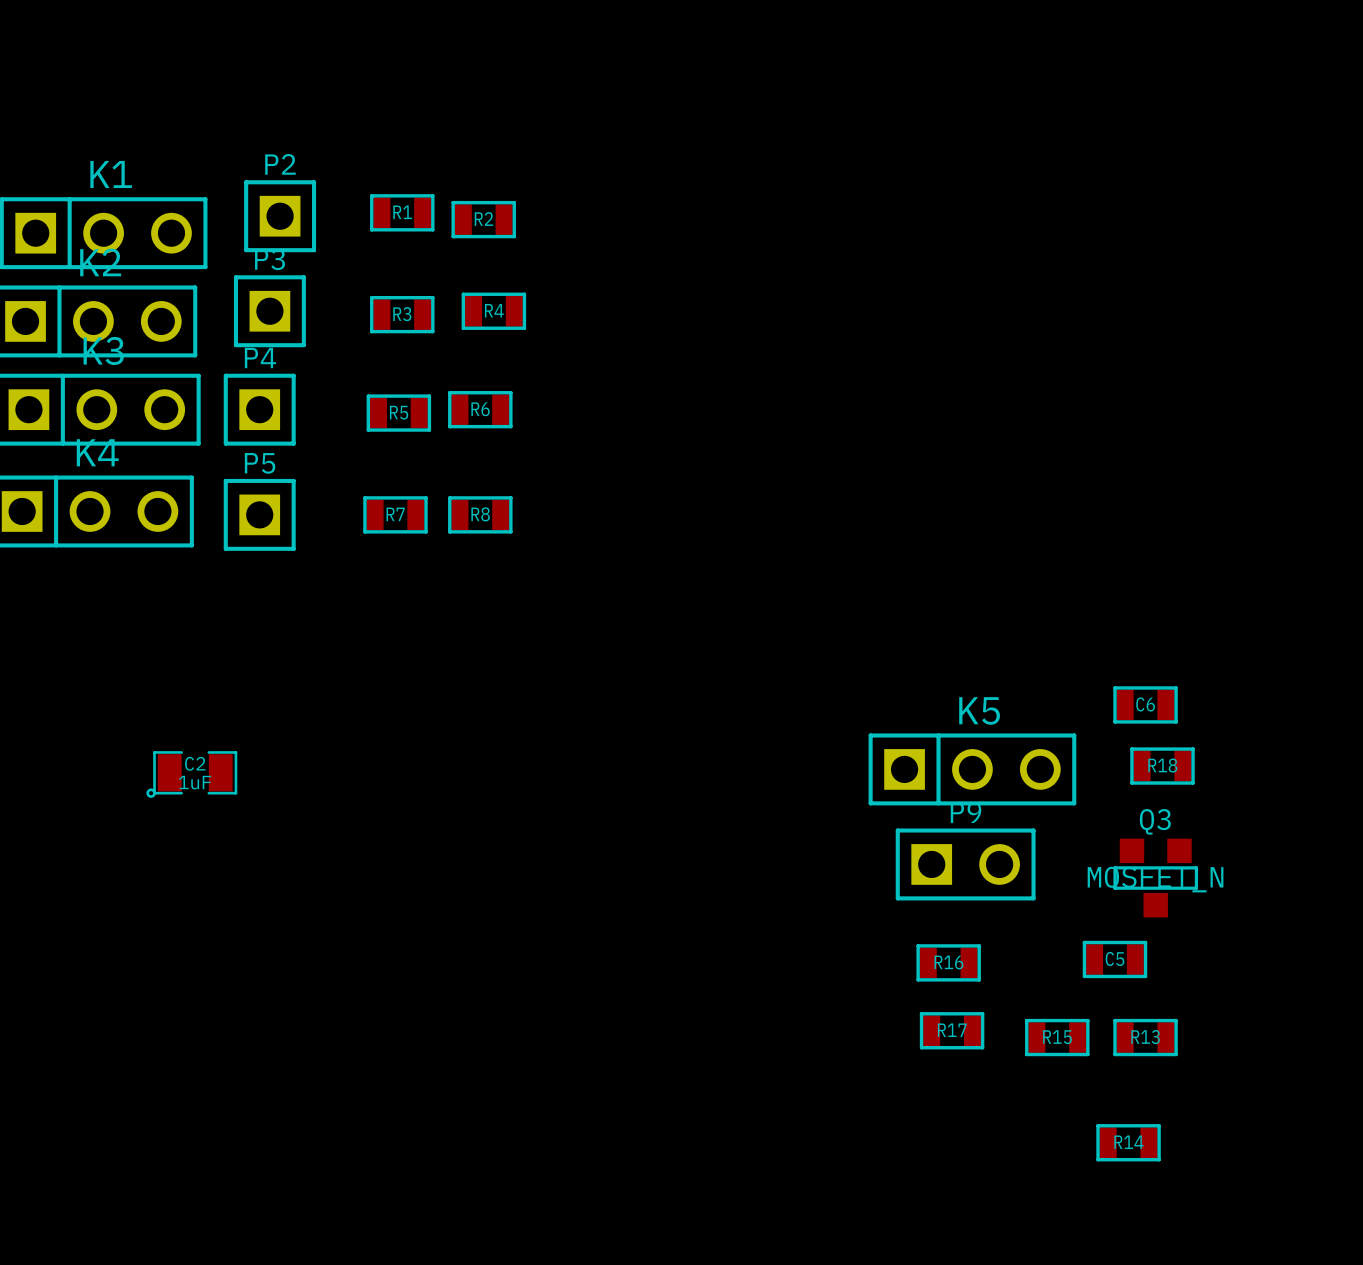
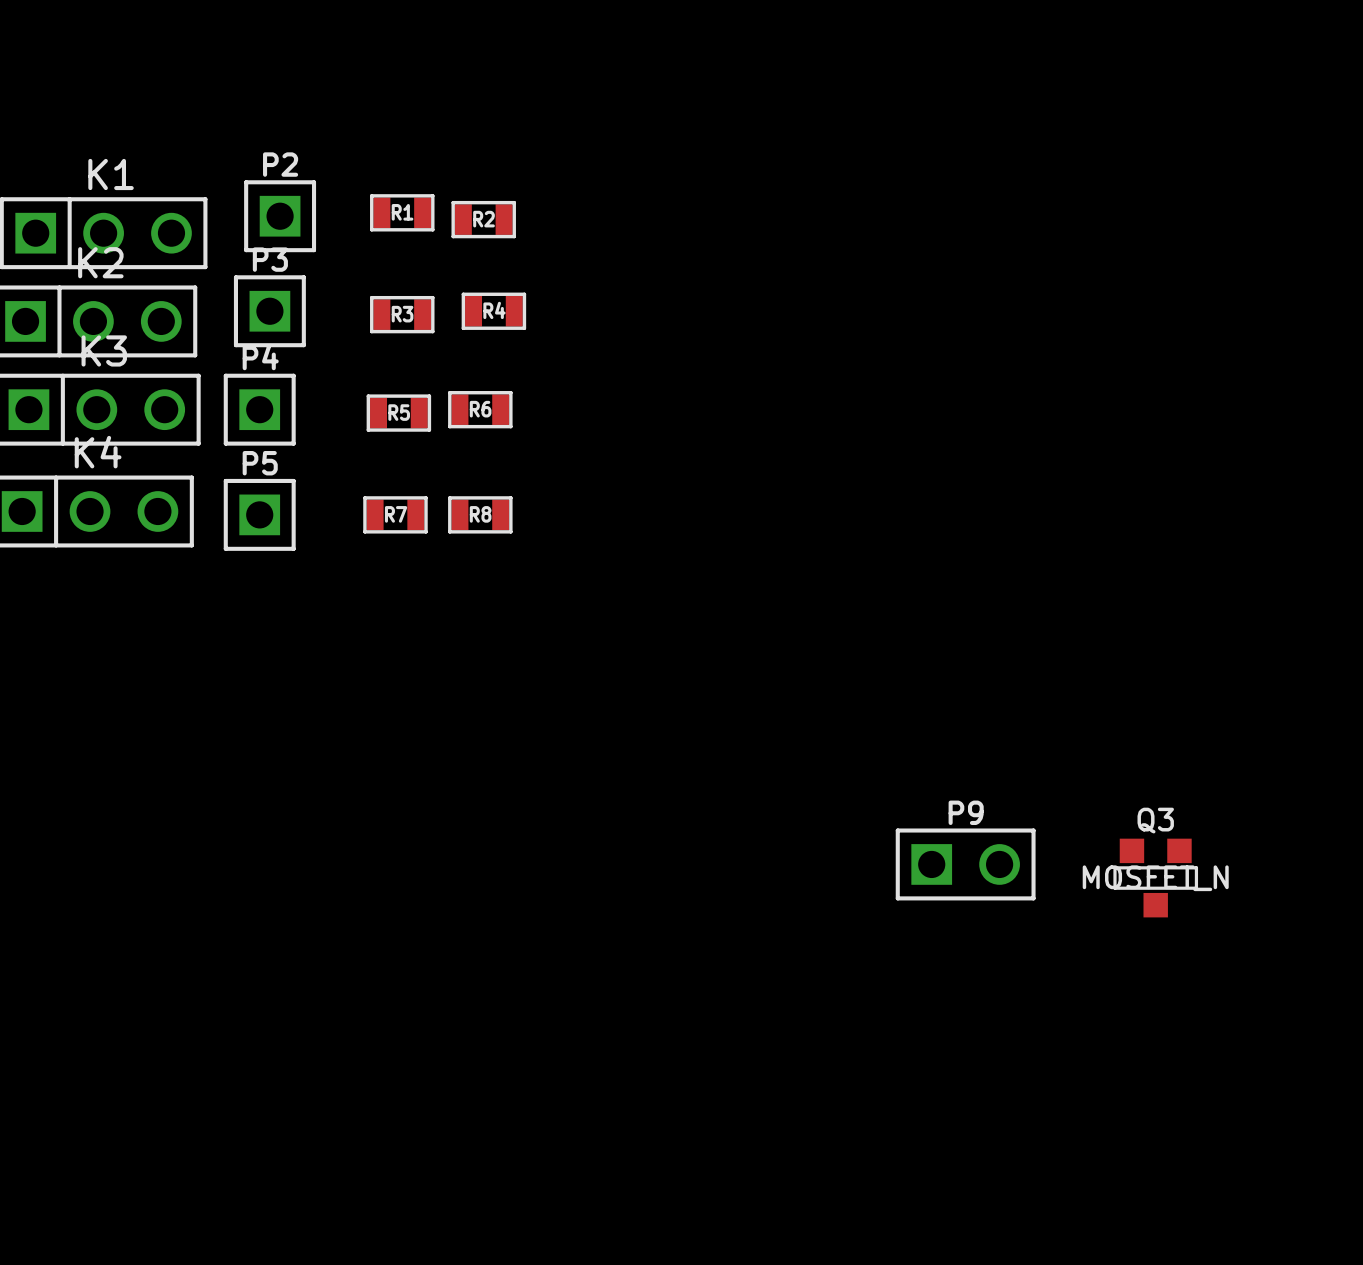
C6: (1145, 704) -> none
R18: (1162, 766) -> none
K5: (972, 769) -> none
C2: 1uF (191, 774) -> none
C5: (1114, 959) -> none
R16: (948, 962) -> none
R17: (952, 1030) -> none
R15: (1057, 1037) -> none
R13: (1145, 1037) -> none
R14: (1128, 1142) -> none

